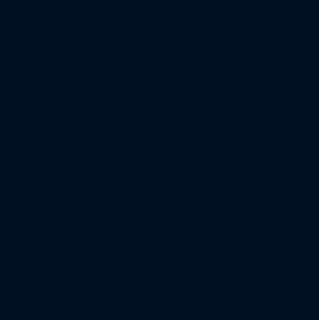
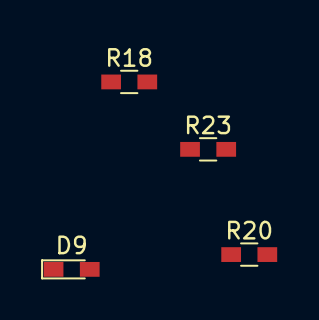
R18: none -> (129, 81)
R23: none -> (208, 149)
R20: none -> (249, 254)
D9: none -> (70, 269)

